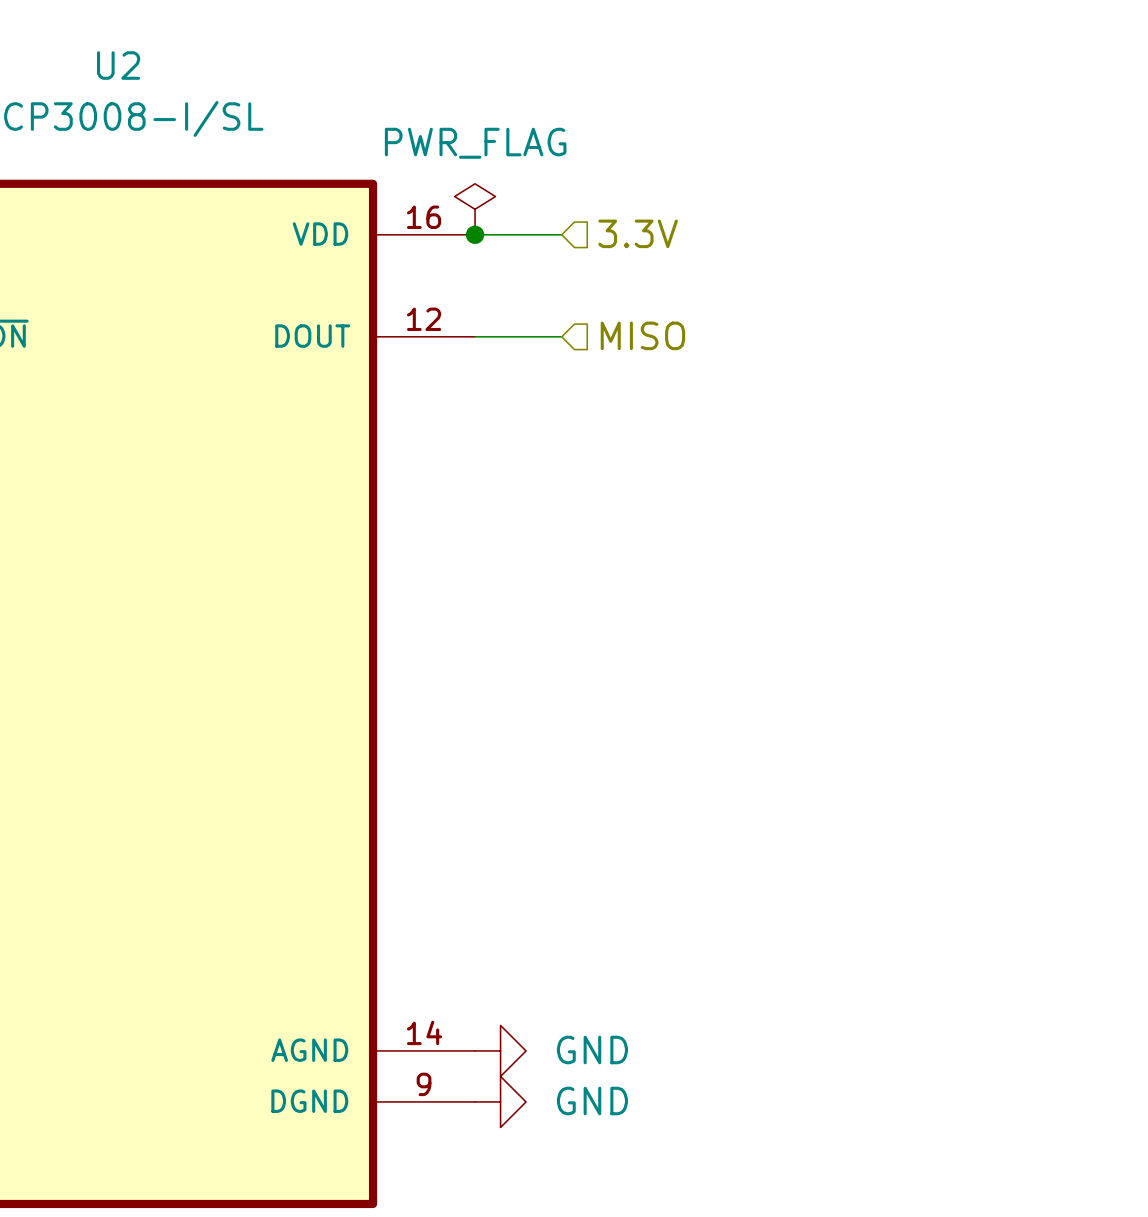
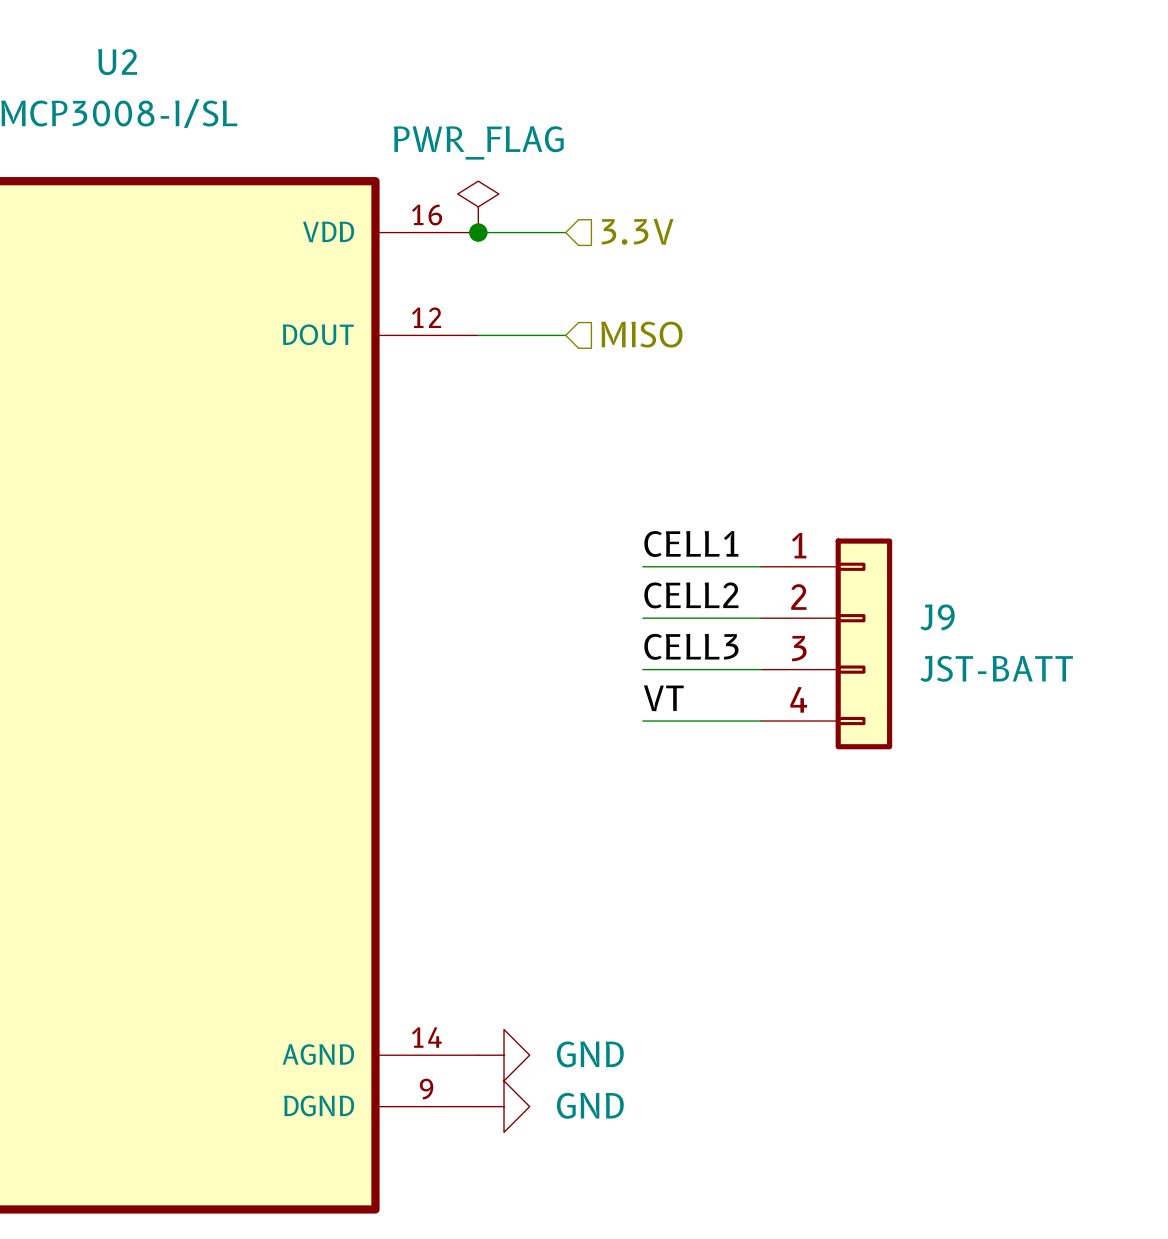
label: none -> CELL1 (691, 543)
wire: none -> (642, 566) (761, 566)
label: none -> CELL2 (691, 595)
wire: none -> (642, 618) (761, 618)
J9: none -> JST-BATT (826, 643)
label: none -> CELL3 (691, 646)
wire: none -> (642, 669) (761, 669)
label: none -> VT (663, 698)
wire: none -> (642, 721) (761, 721)

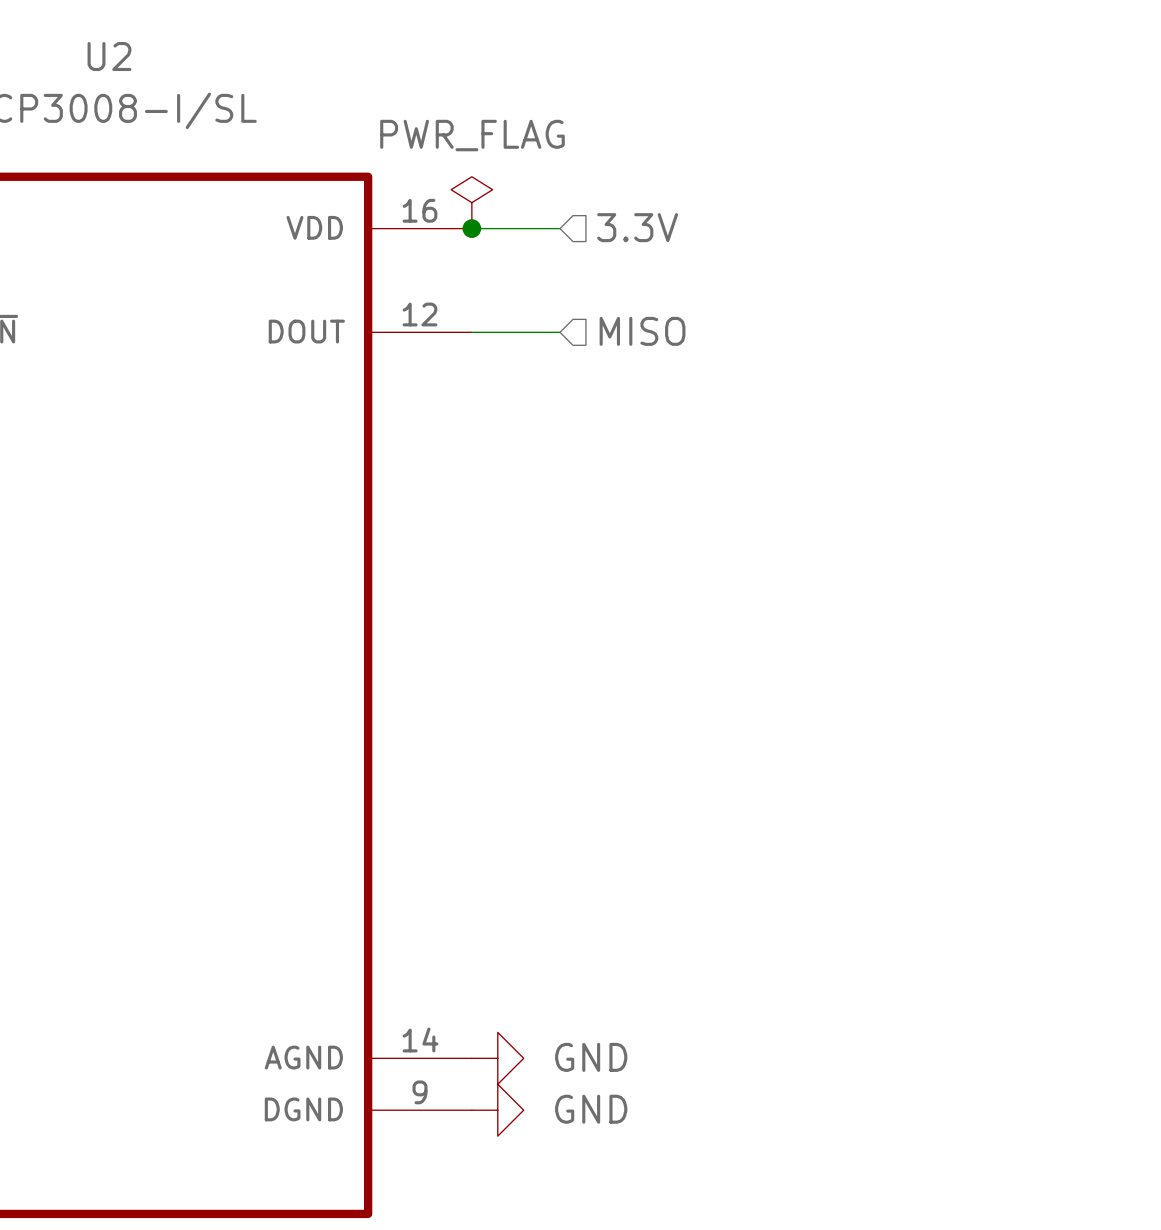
label: CELL1 (691, 543) -> none
wire: (642, 566) (761, 566) -> none
label: CELL2 (691, 595) -> none
wire: (642, 618) (761, 618) -> none
J9: JST-BATT (826, 643) -> none
label: CELL3 (691, 646) -> none
wire: (642, 669) (761, 669) -> none
label: VT (663, 698) -> none
wire: (642, 721) (761, 721) -> none

